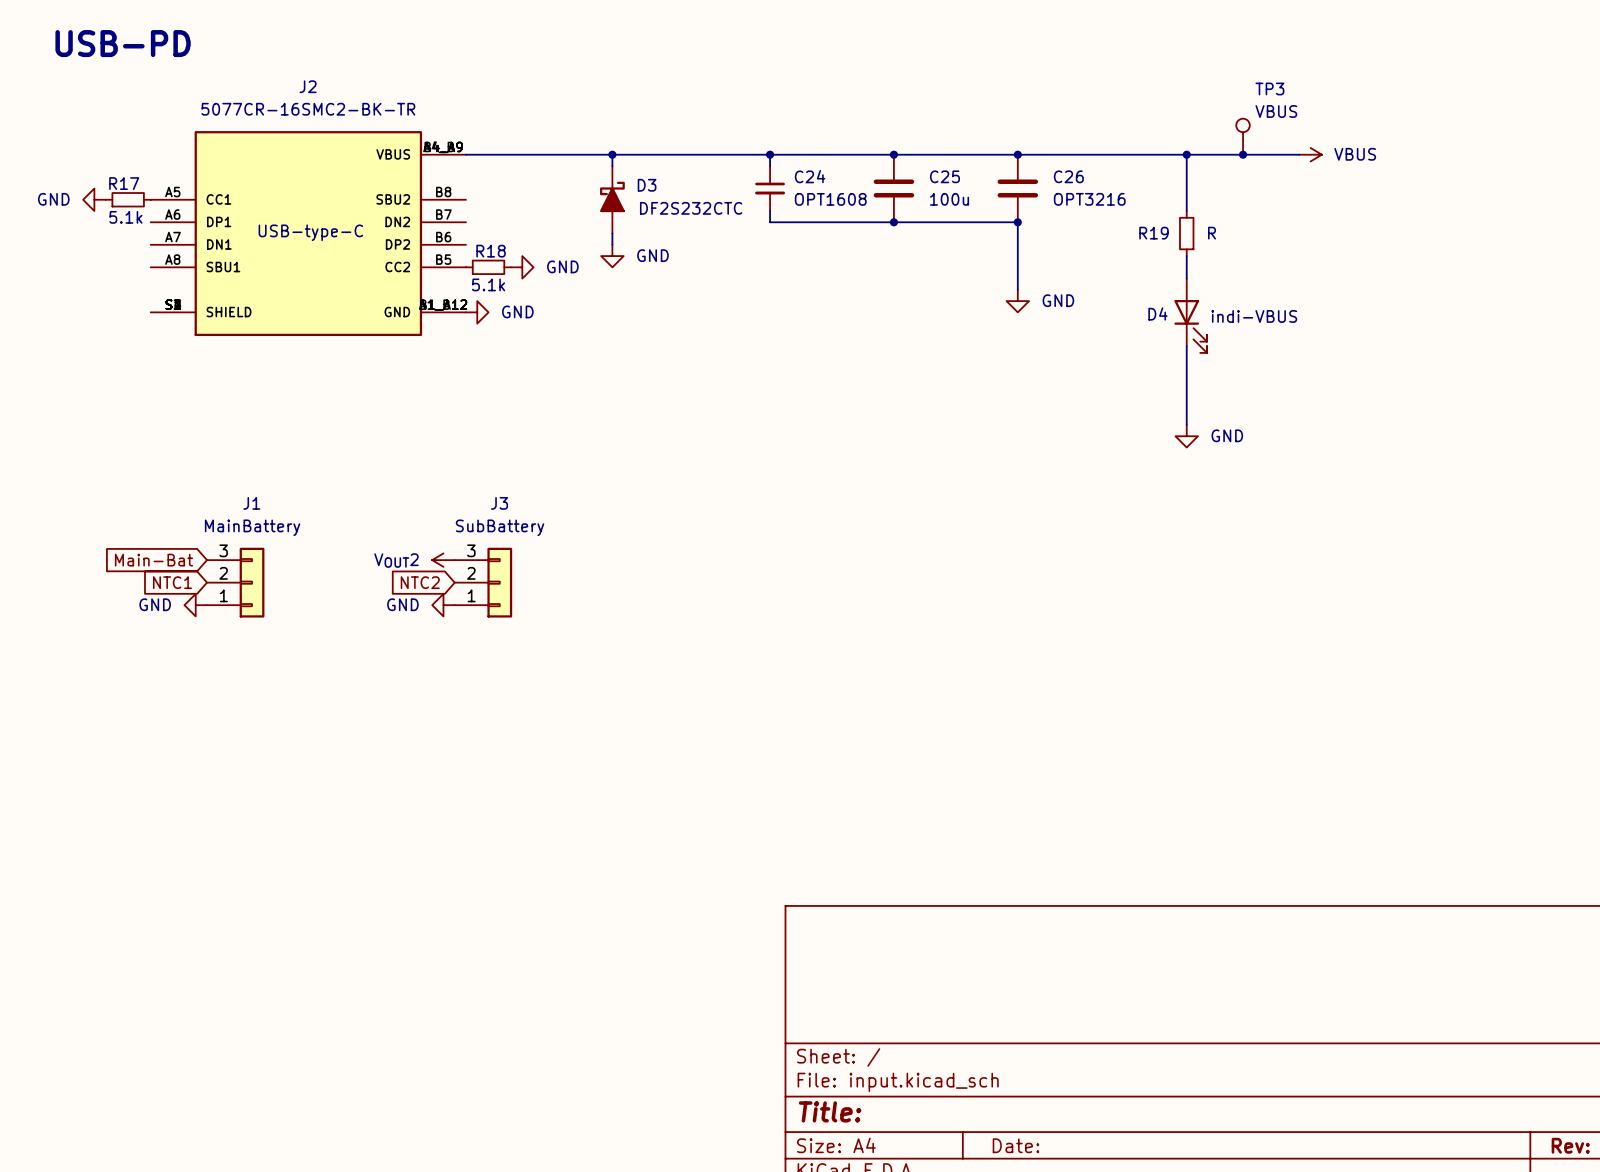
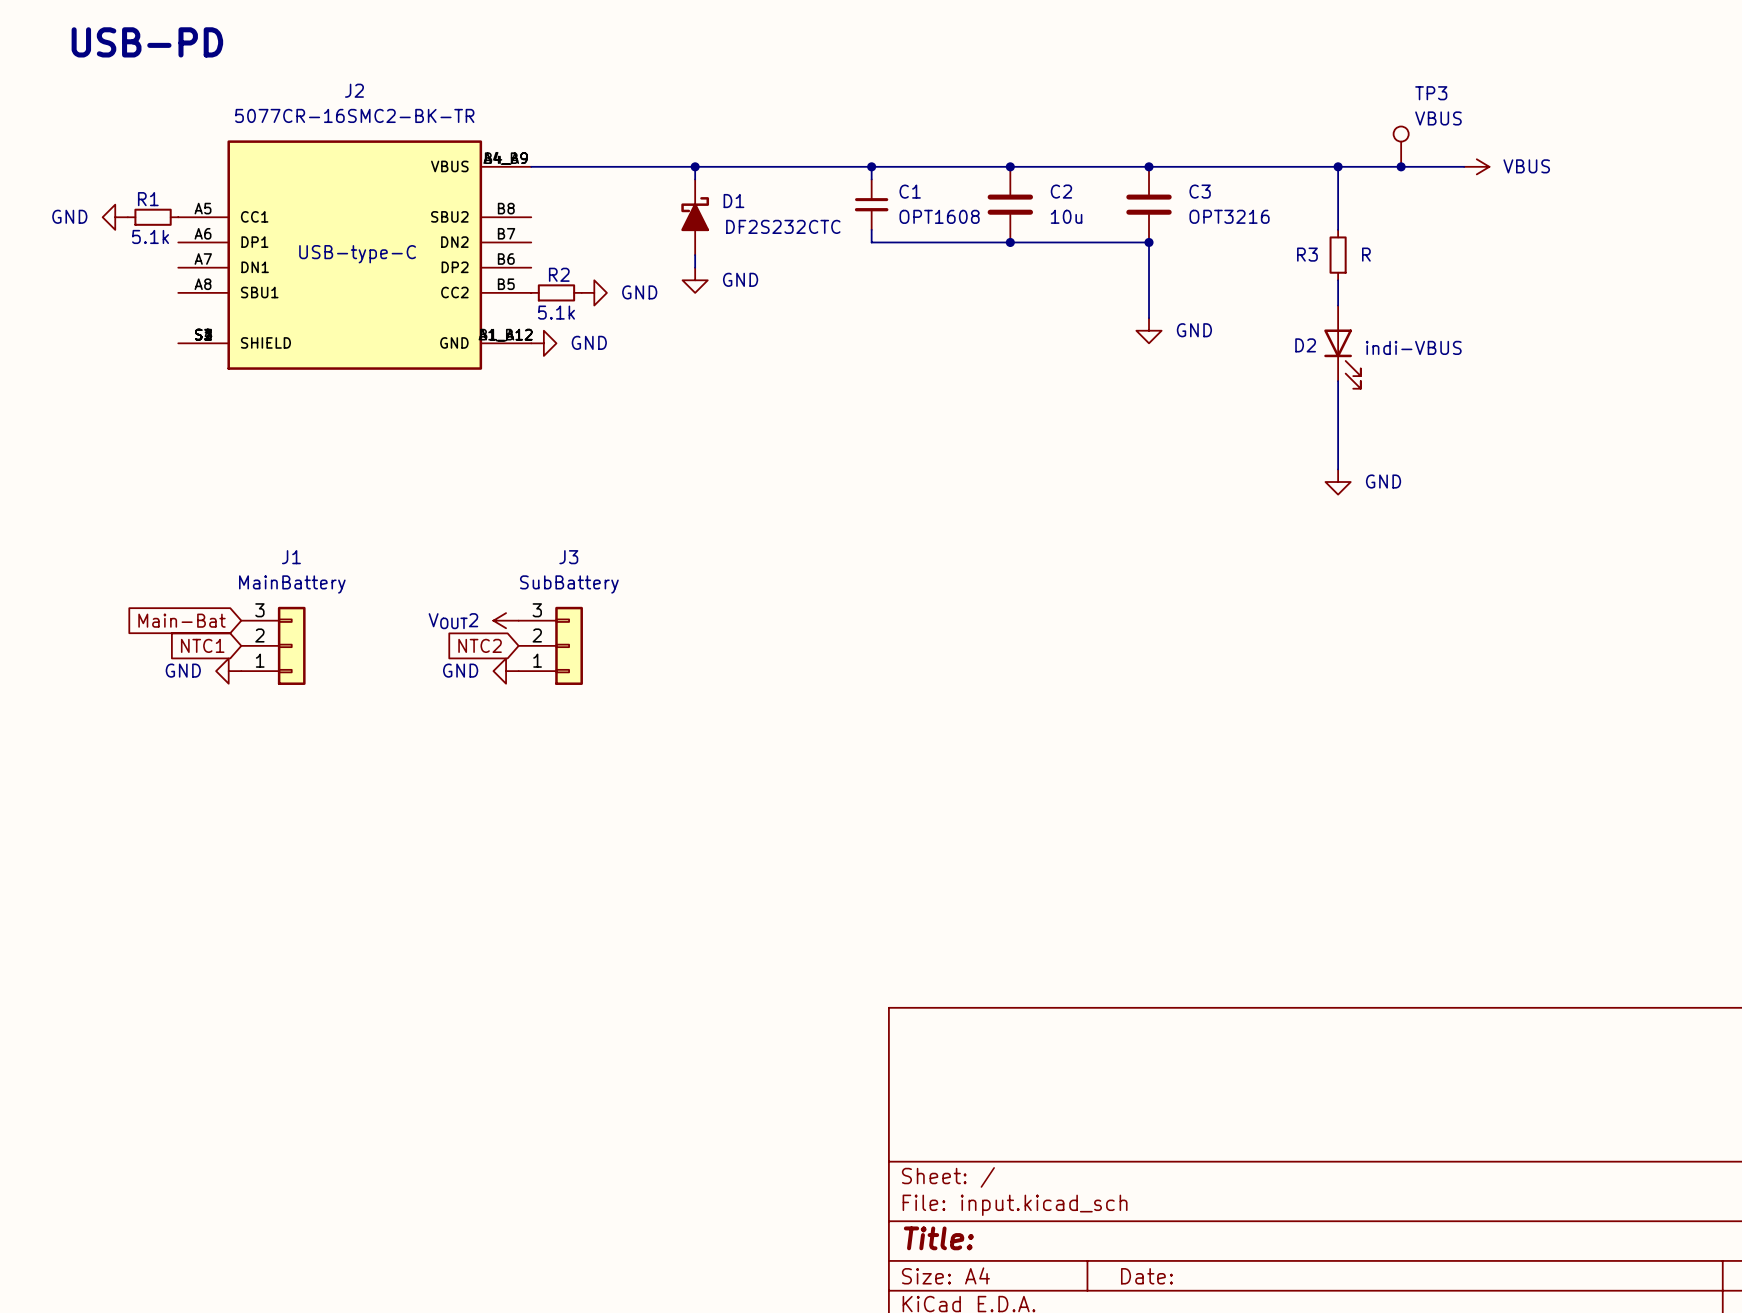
C24 name: C24 (810, 176) -> C1 (910, 191)
C25 name: C25 (944, 176) -> C2 (1061, 191)
C26 name: C26 (1068, 176) -> C3 (1200, 191)
R17 name: R17 (124, 183) -> R1 (148, 199)
D3 name: D3 (647, 185) -> D1 (733, 201)
C25 value: 100u (949, 199) -> 10u (1066, 216)
R19 name: R19 (1153, 233) -> R3 (1307, 254)
R18 name: R18 (491, 251) -> R2 (559, 274)
D4 name: D4 (1157, 313) -> D2 (1305, 345)

